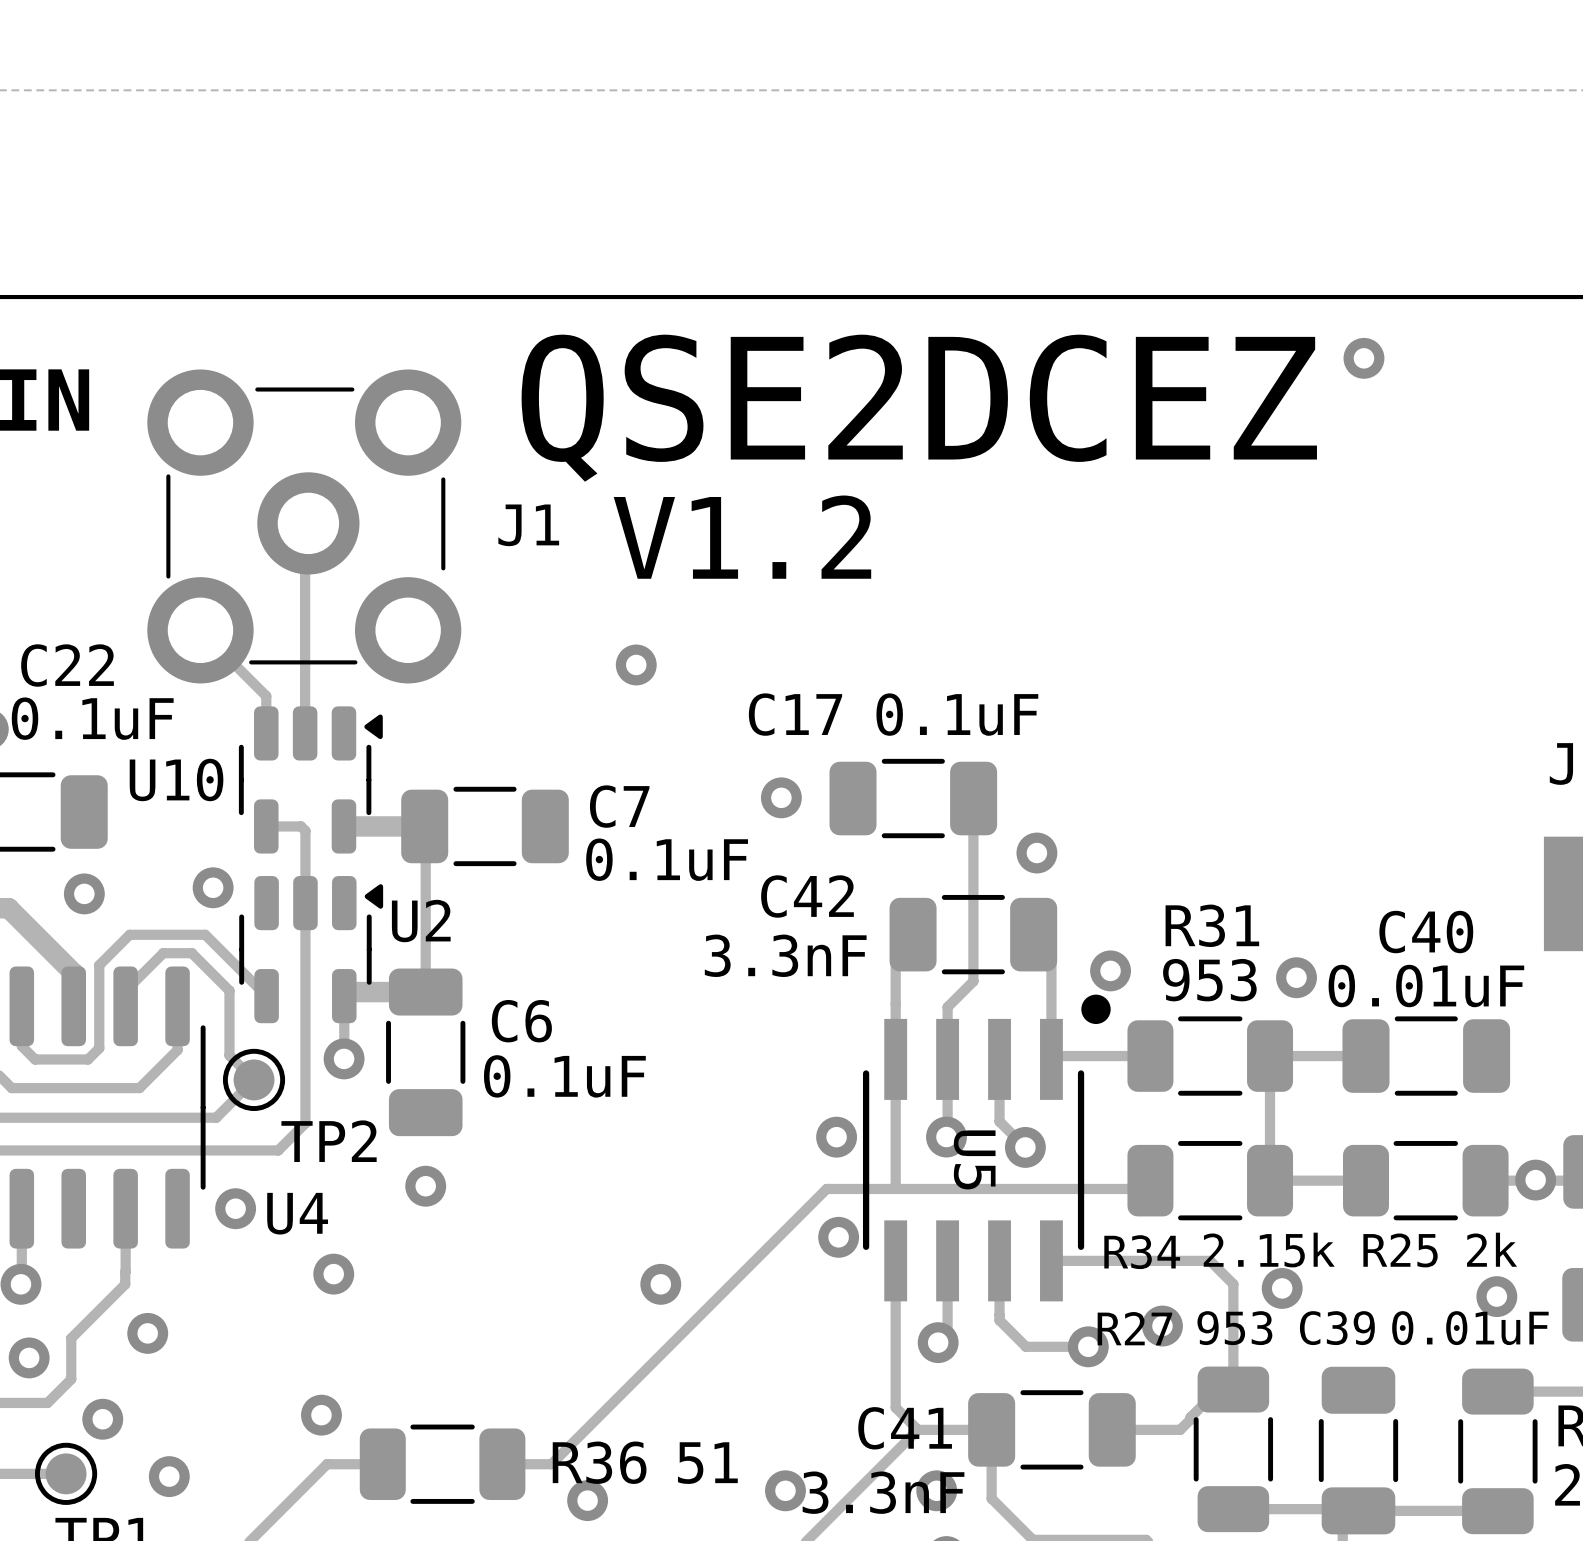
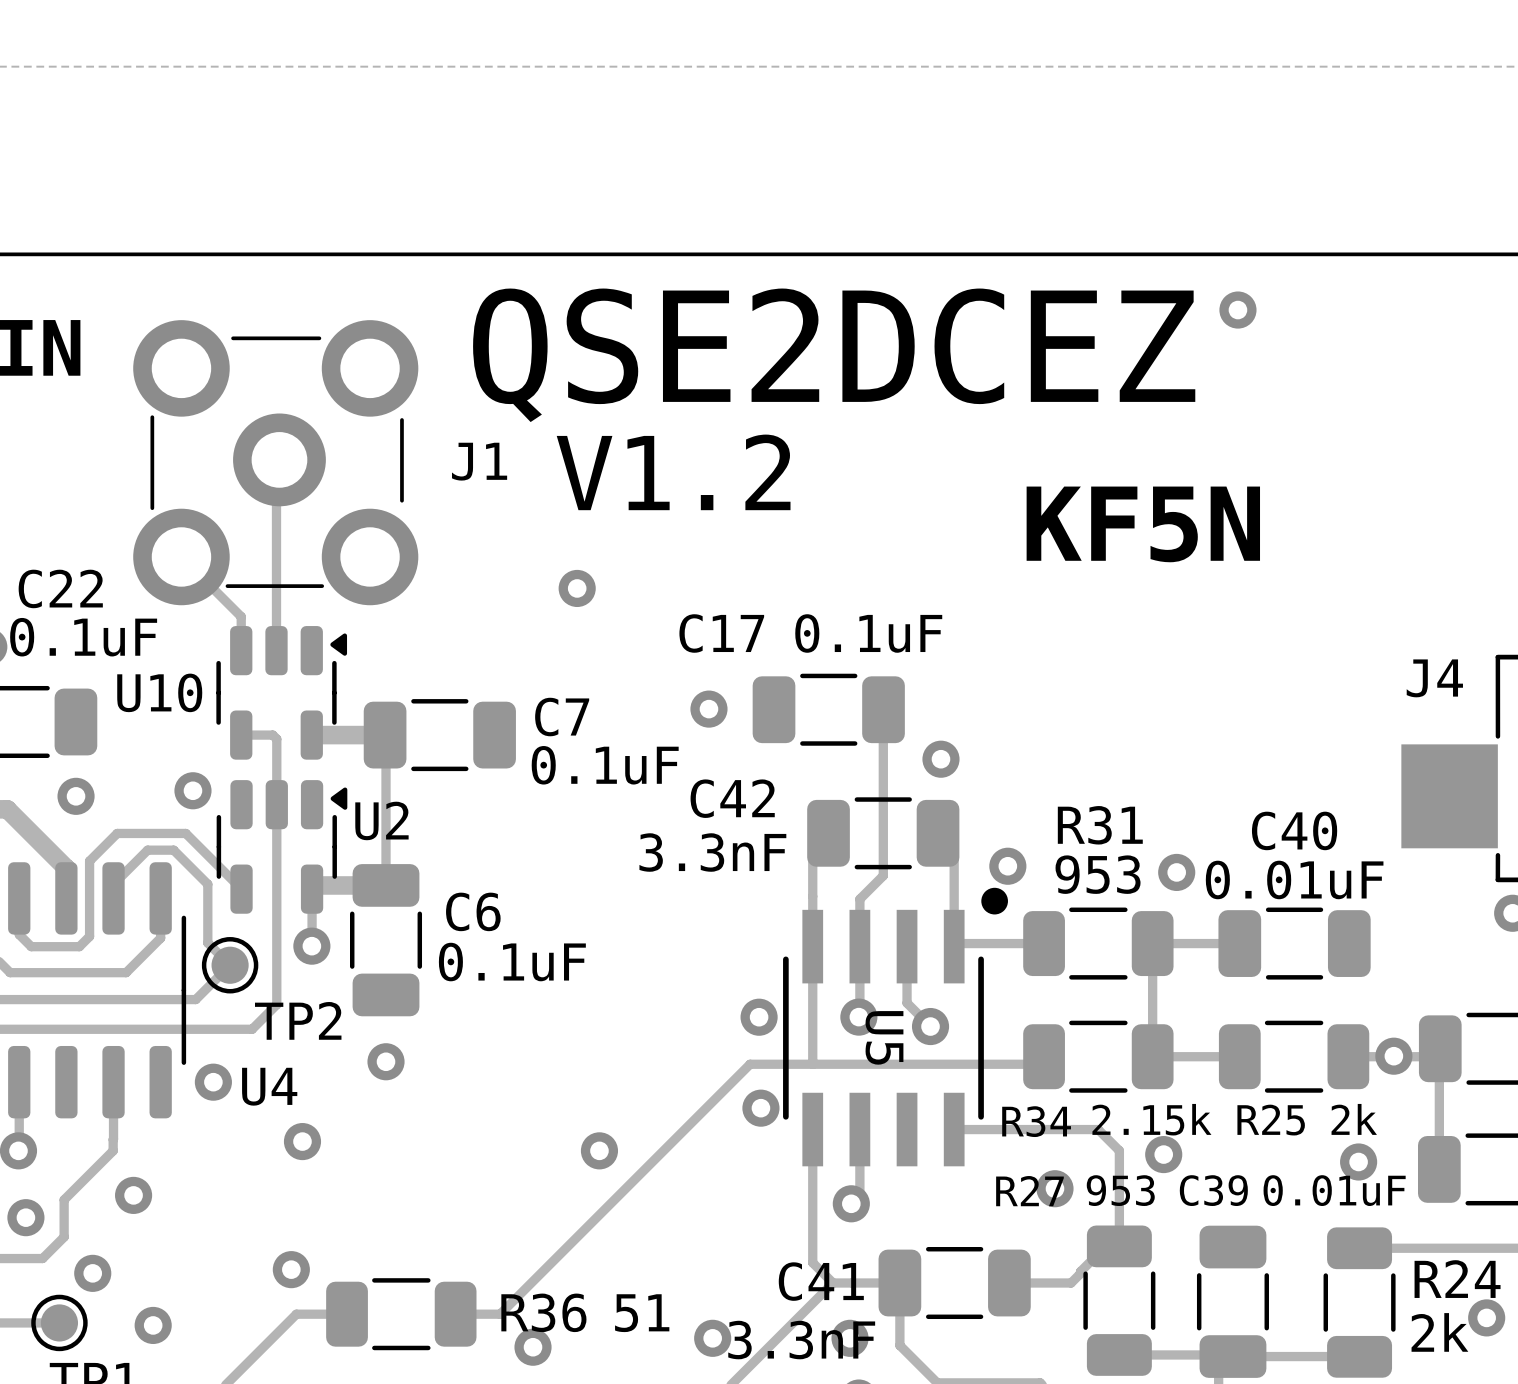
text: none -> KF5N (1143, 524)
track: (999, 1260) (999, 1320) (1026, 1346) (1088, 1346) -> none
via: (1088, 1346) -> none

